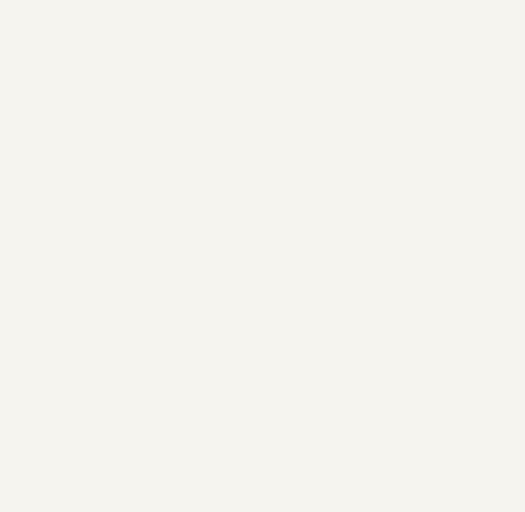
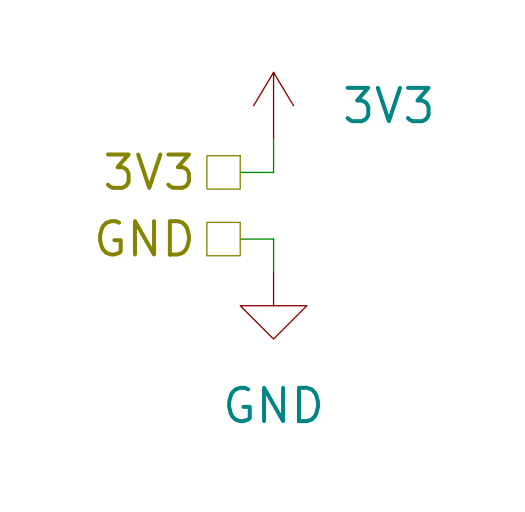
power symbol: none -> 3V3 (273, 105)
wire: none -> (273, 139) (273, 172) (240, 172)
hierarchical label: none -> 3V3 (148, 171)
hierarchical label: none -> GND (144, 237)
wire: none -> (240, 239) (273, 239) (273, 272)
power symbol: none -> GND (273, 305)

